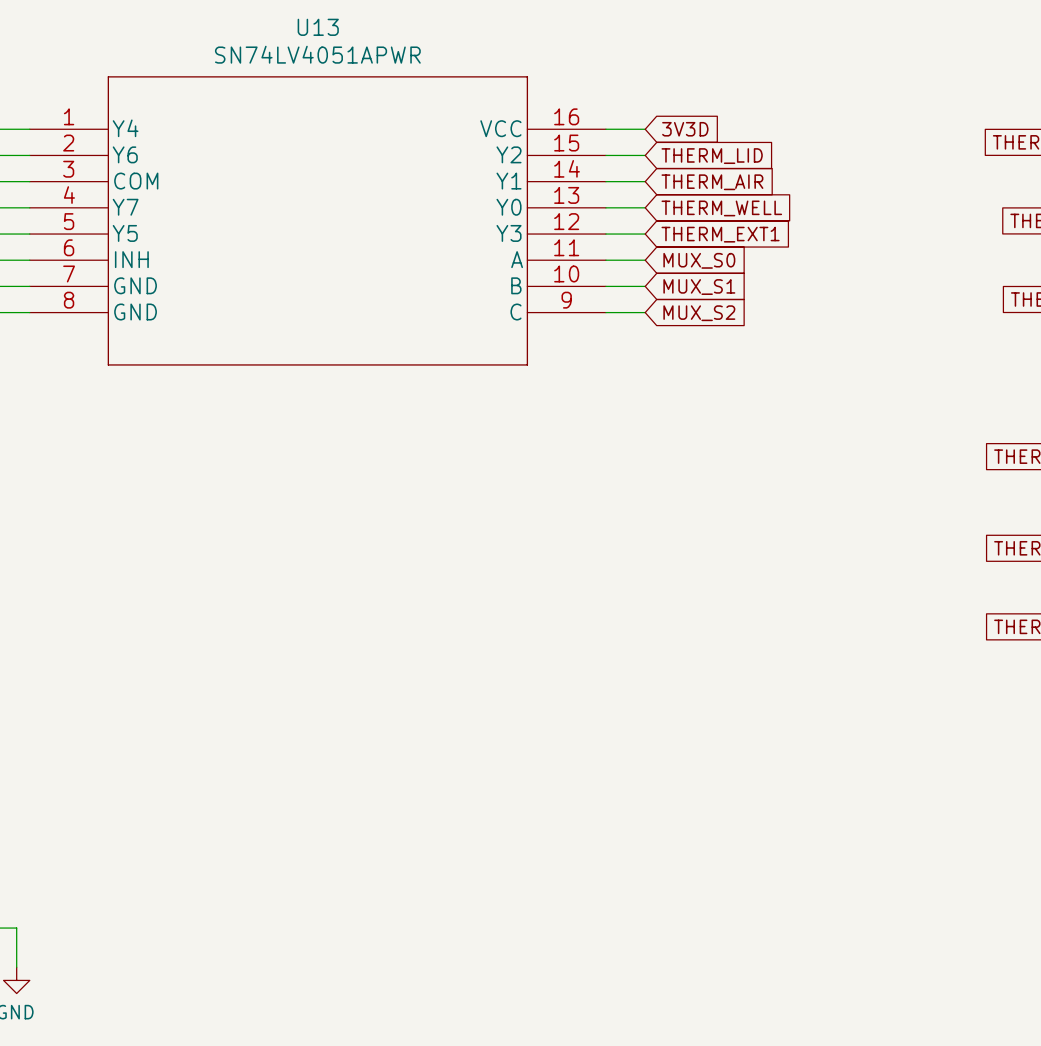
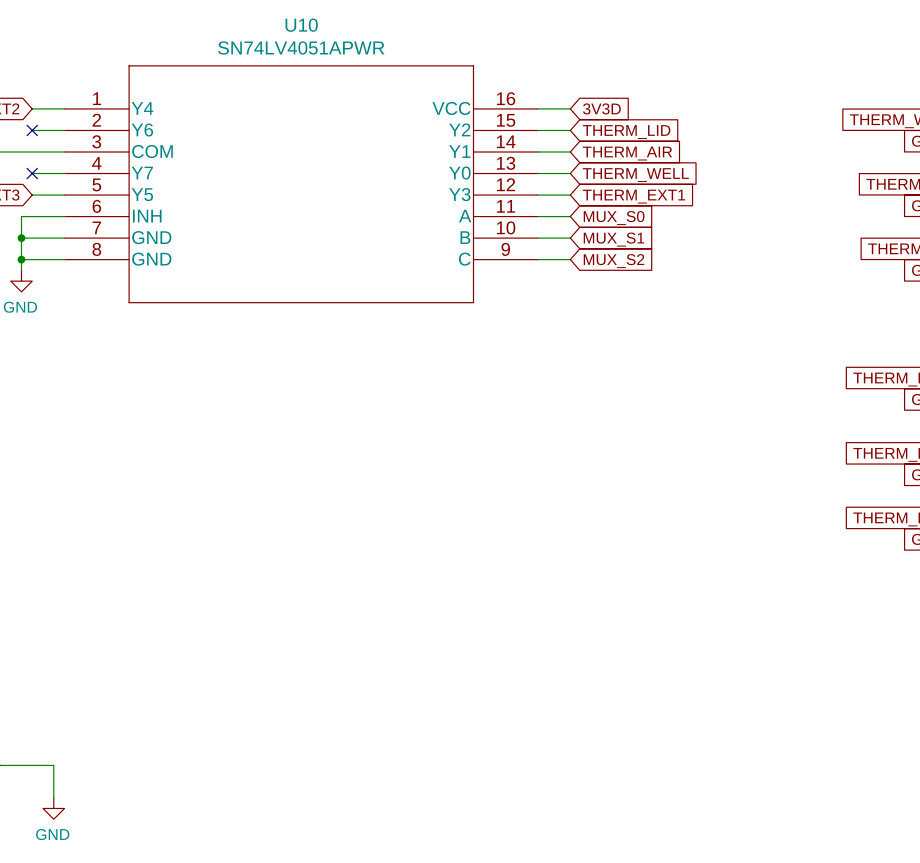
U13 name: U13 (318, 27) -> U10 (301, 25)

